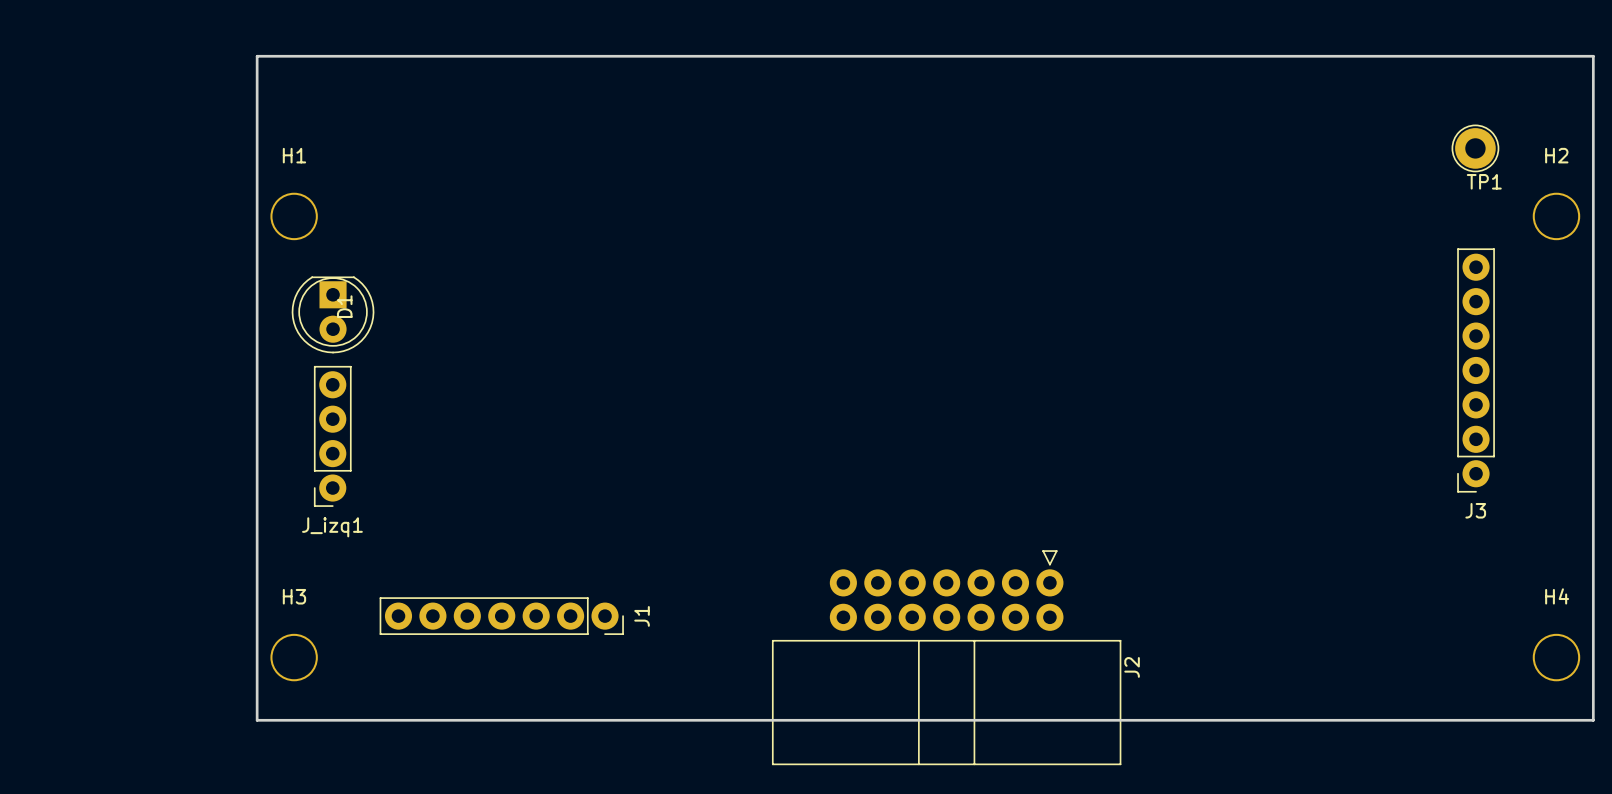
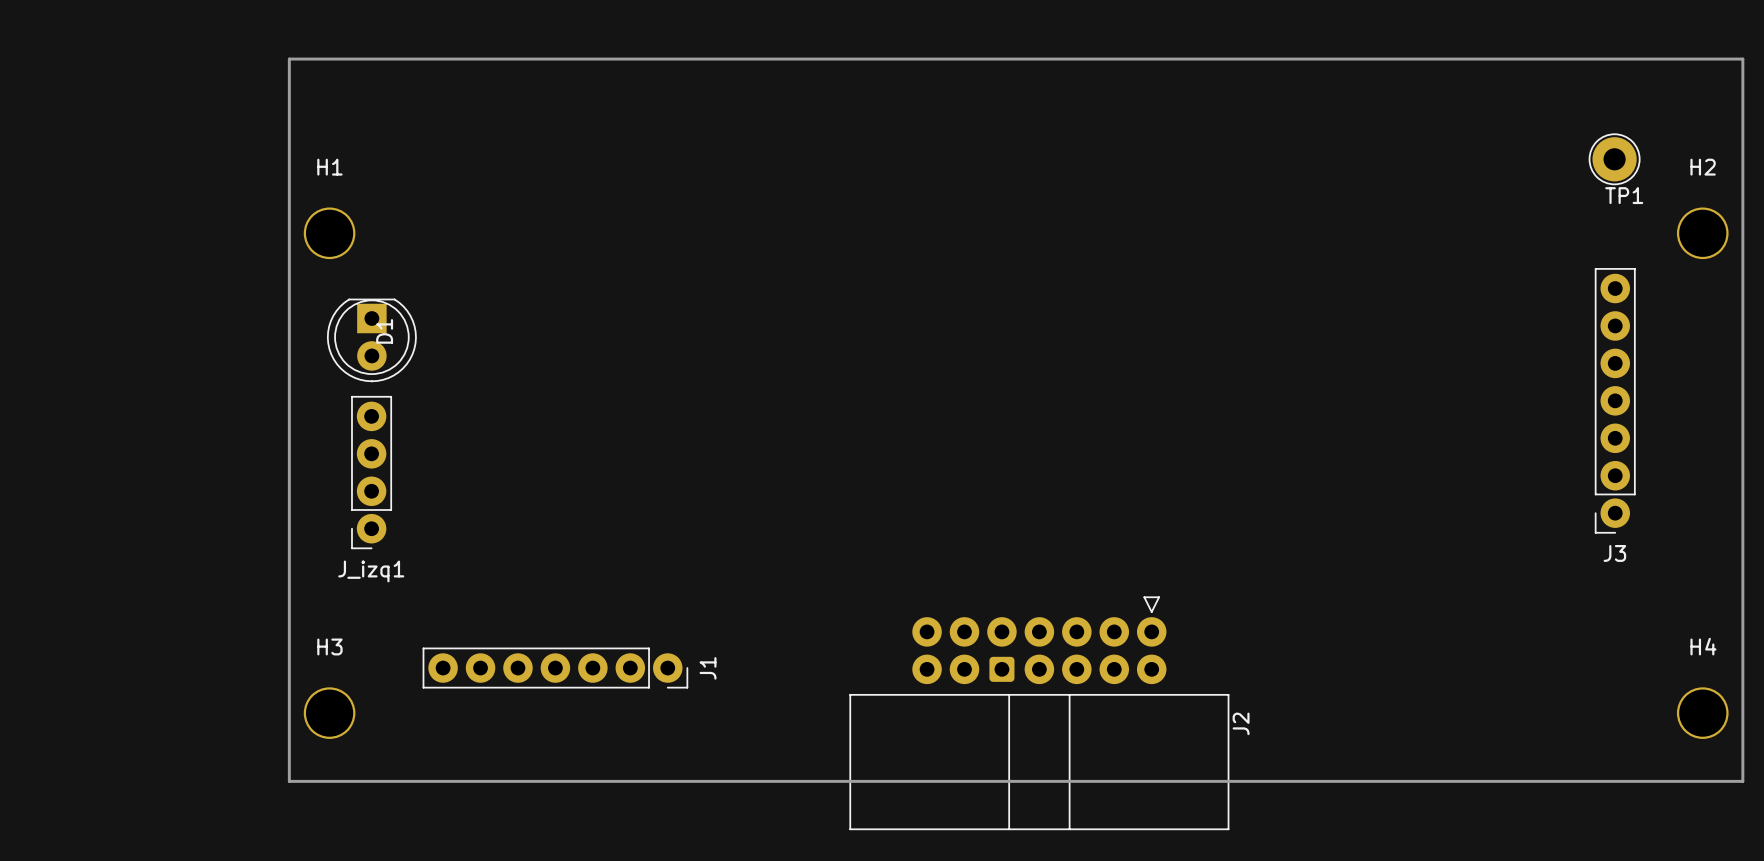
J2 footprint: [771, 550, 1122, 766] -> [849, 596, 1230, 831]

